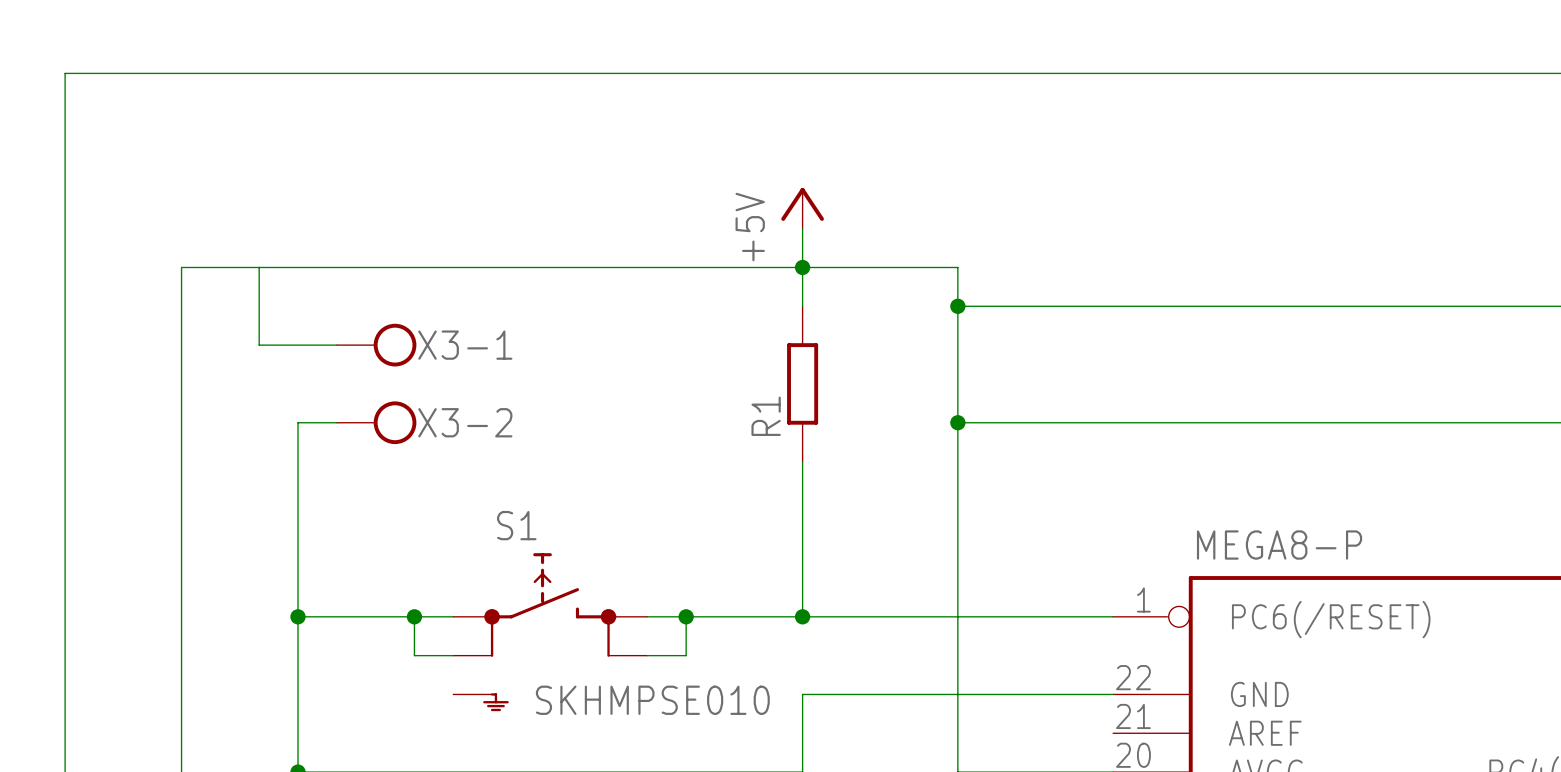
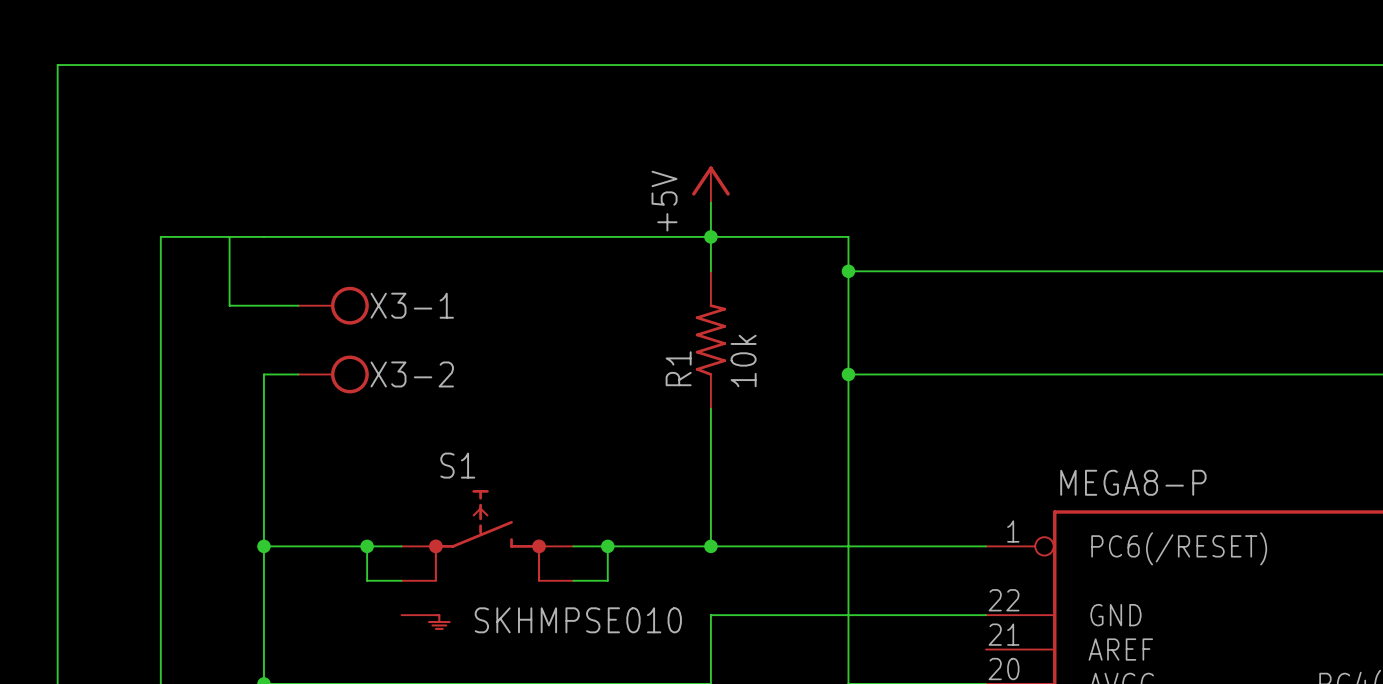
R1 symbol: [787, 306, 819, 462] -> [695, 271, 727, 409]
R1 value: none -> 10k (743, 360)

